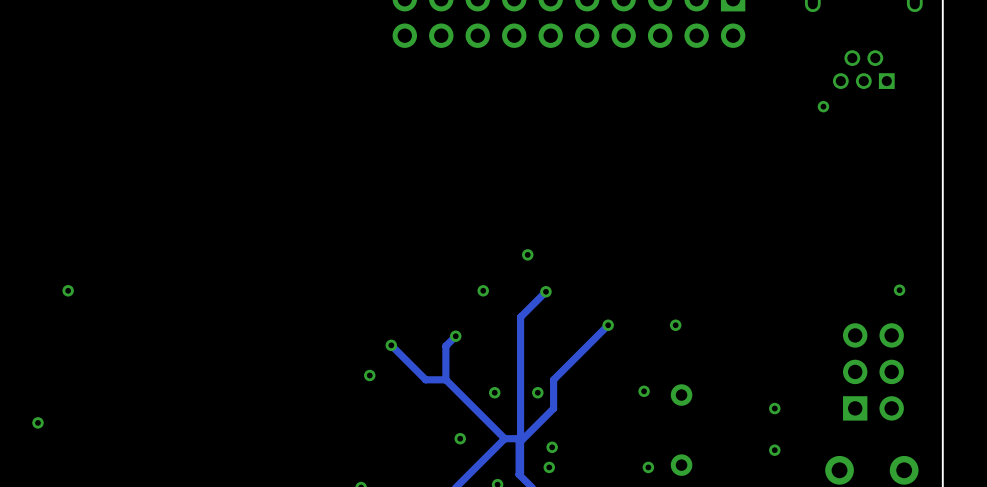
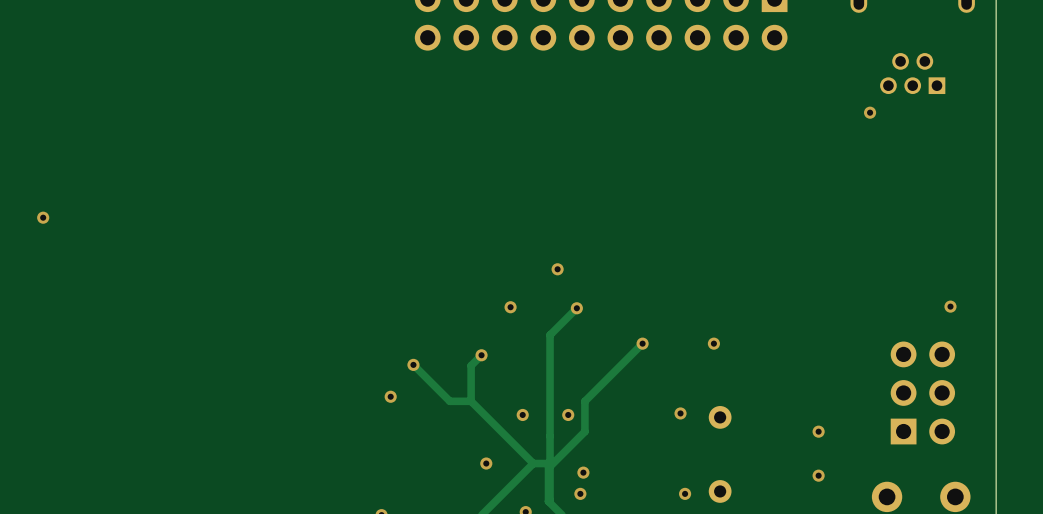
via: none -> (43, 217)
via: (68, 290) -> none
via: (38, 422) -> none

